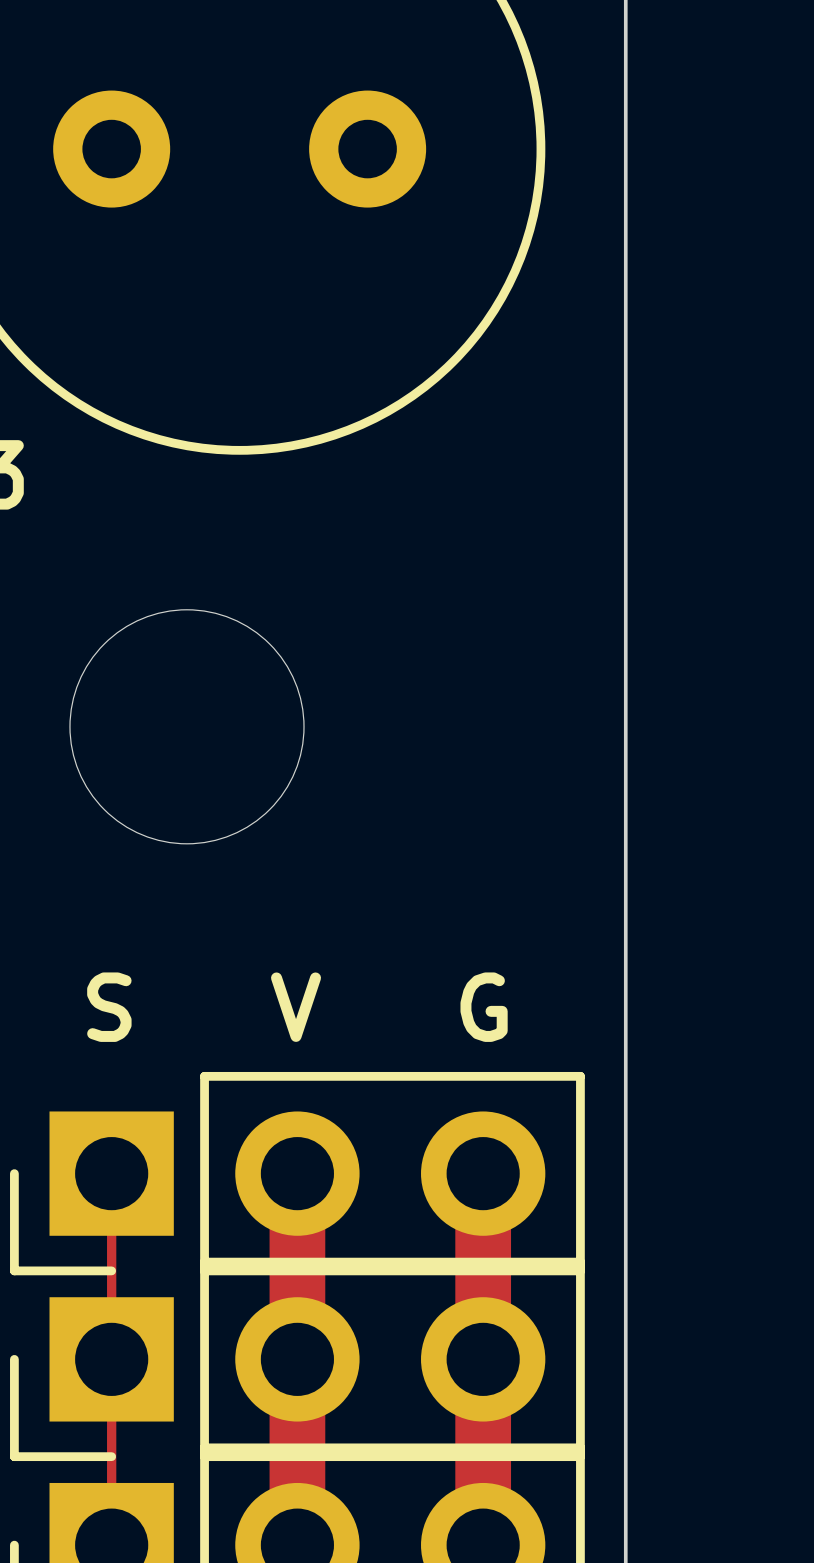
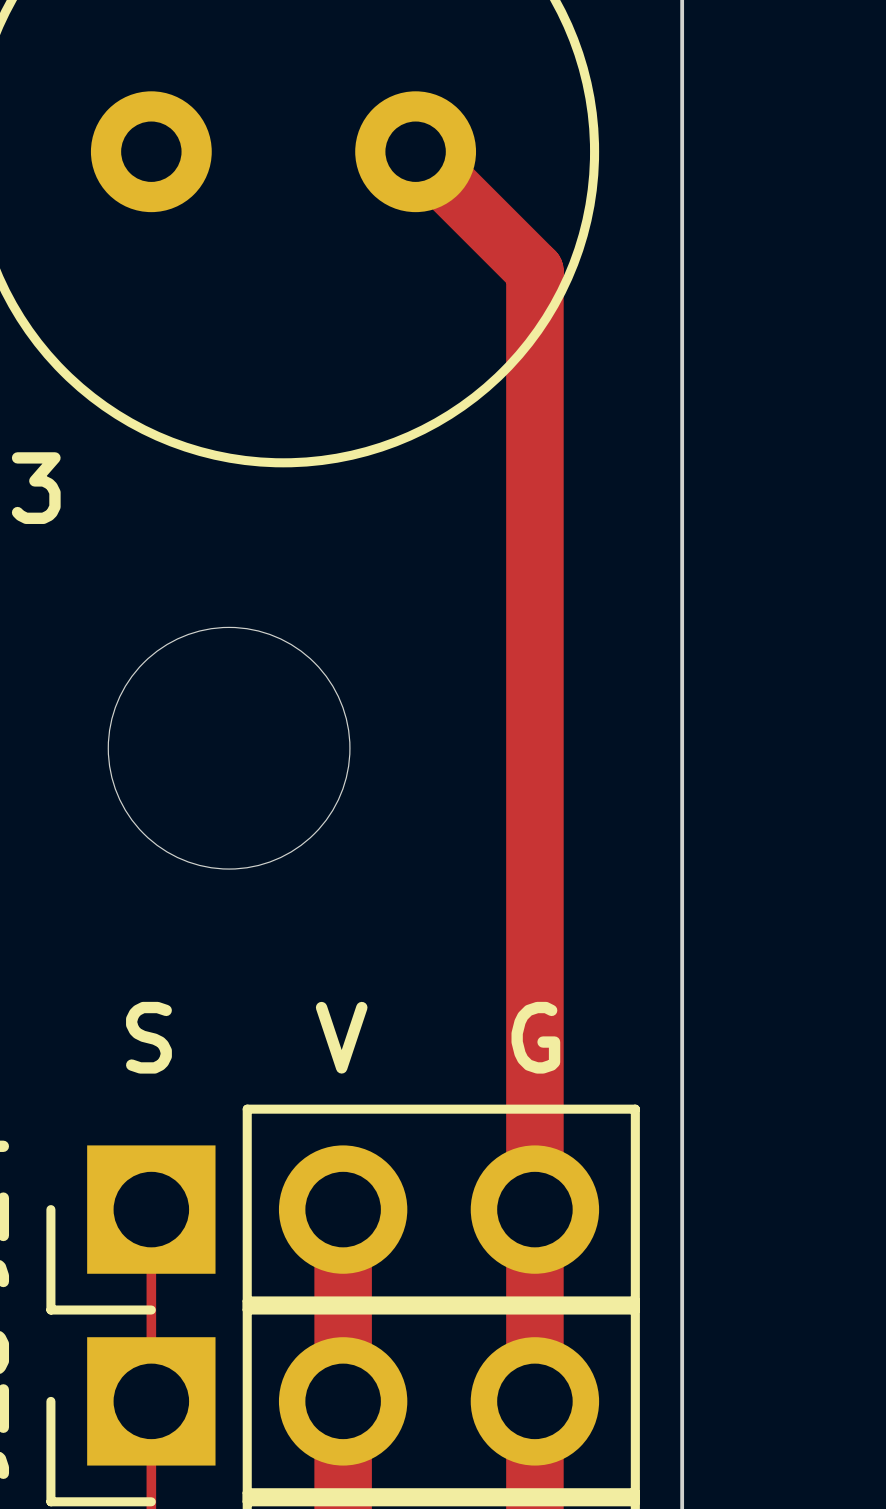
track: none -> (415, 151) (534, 271) (534, 1209)

